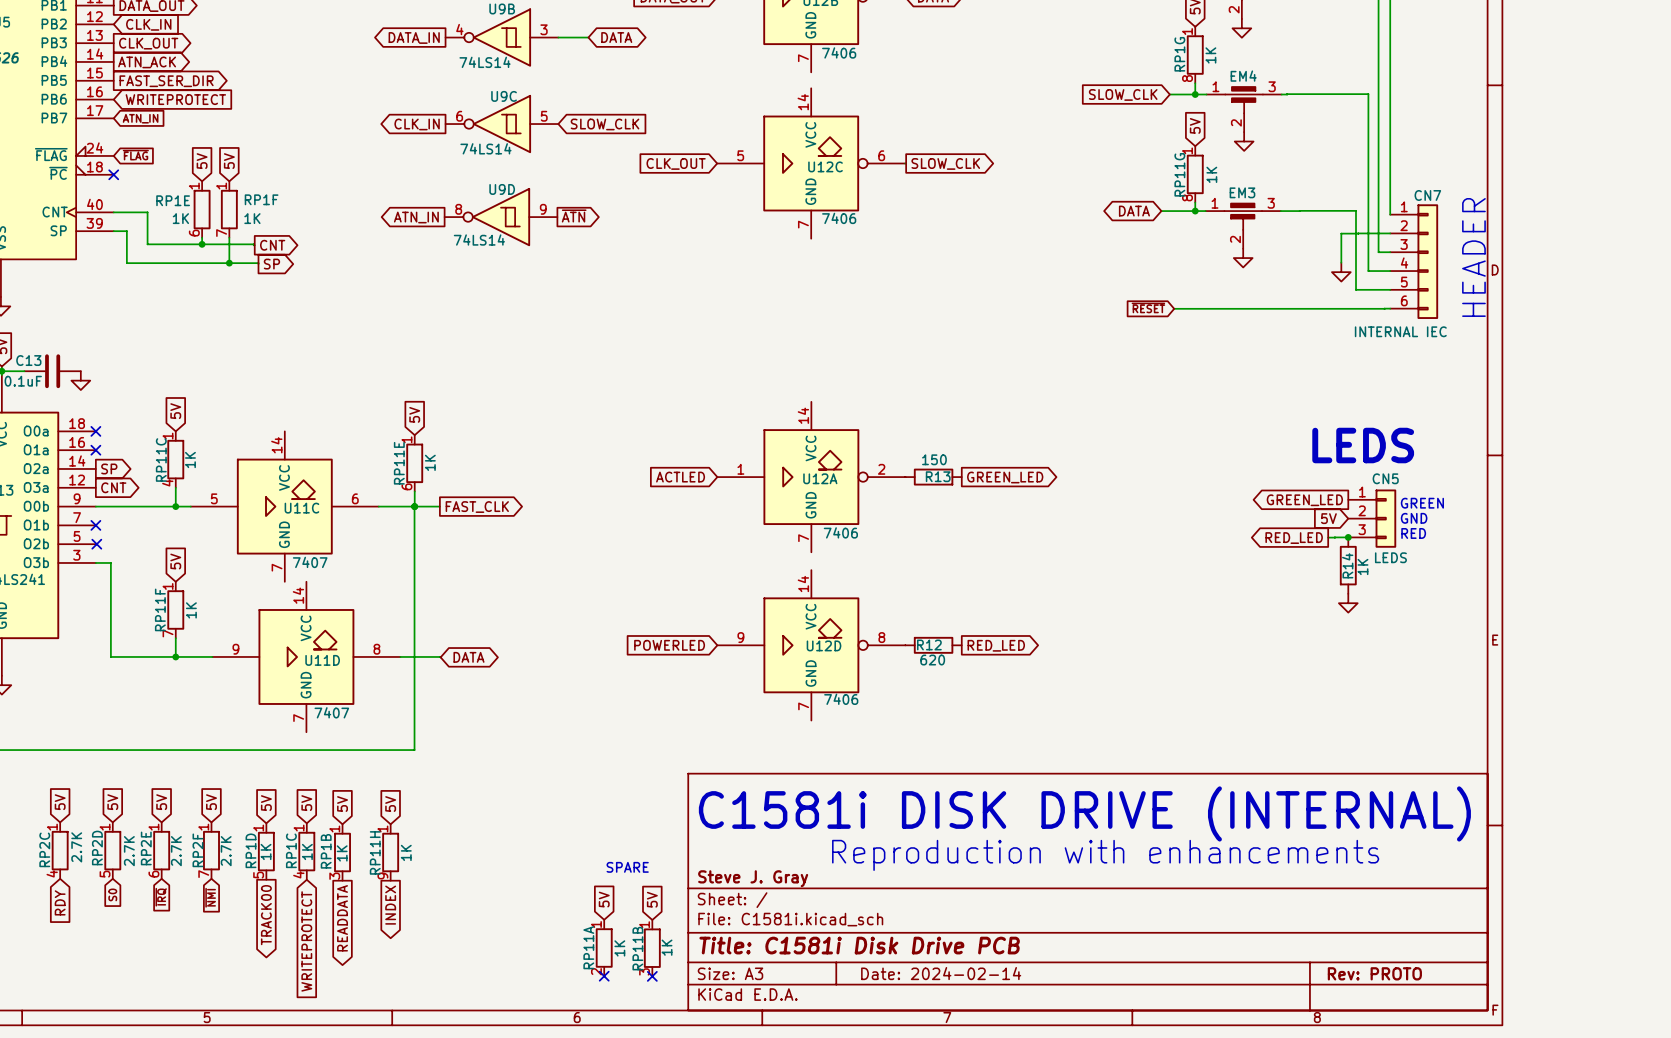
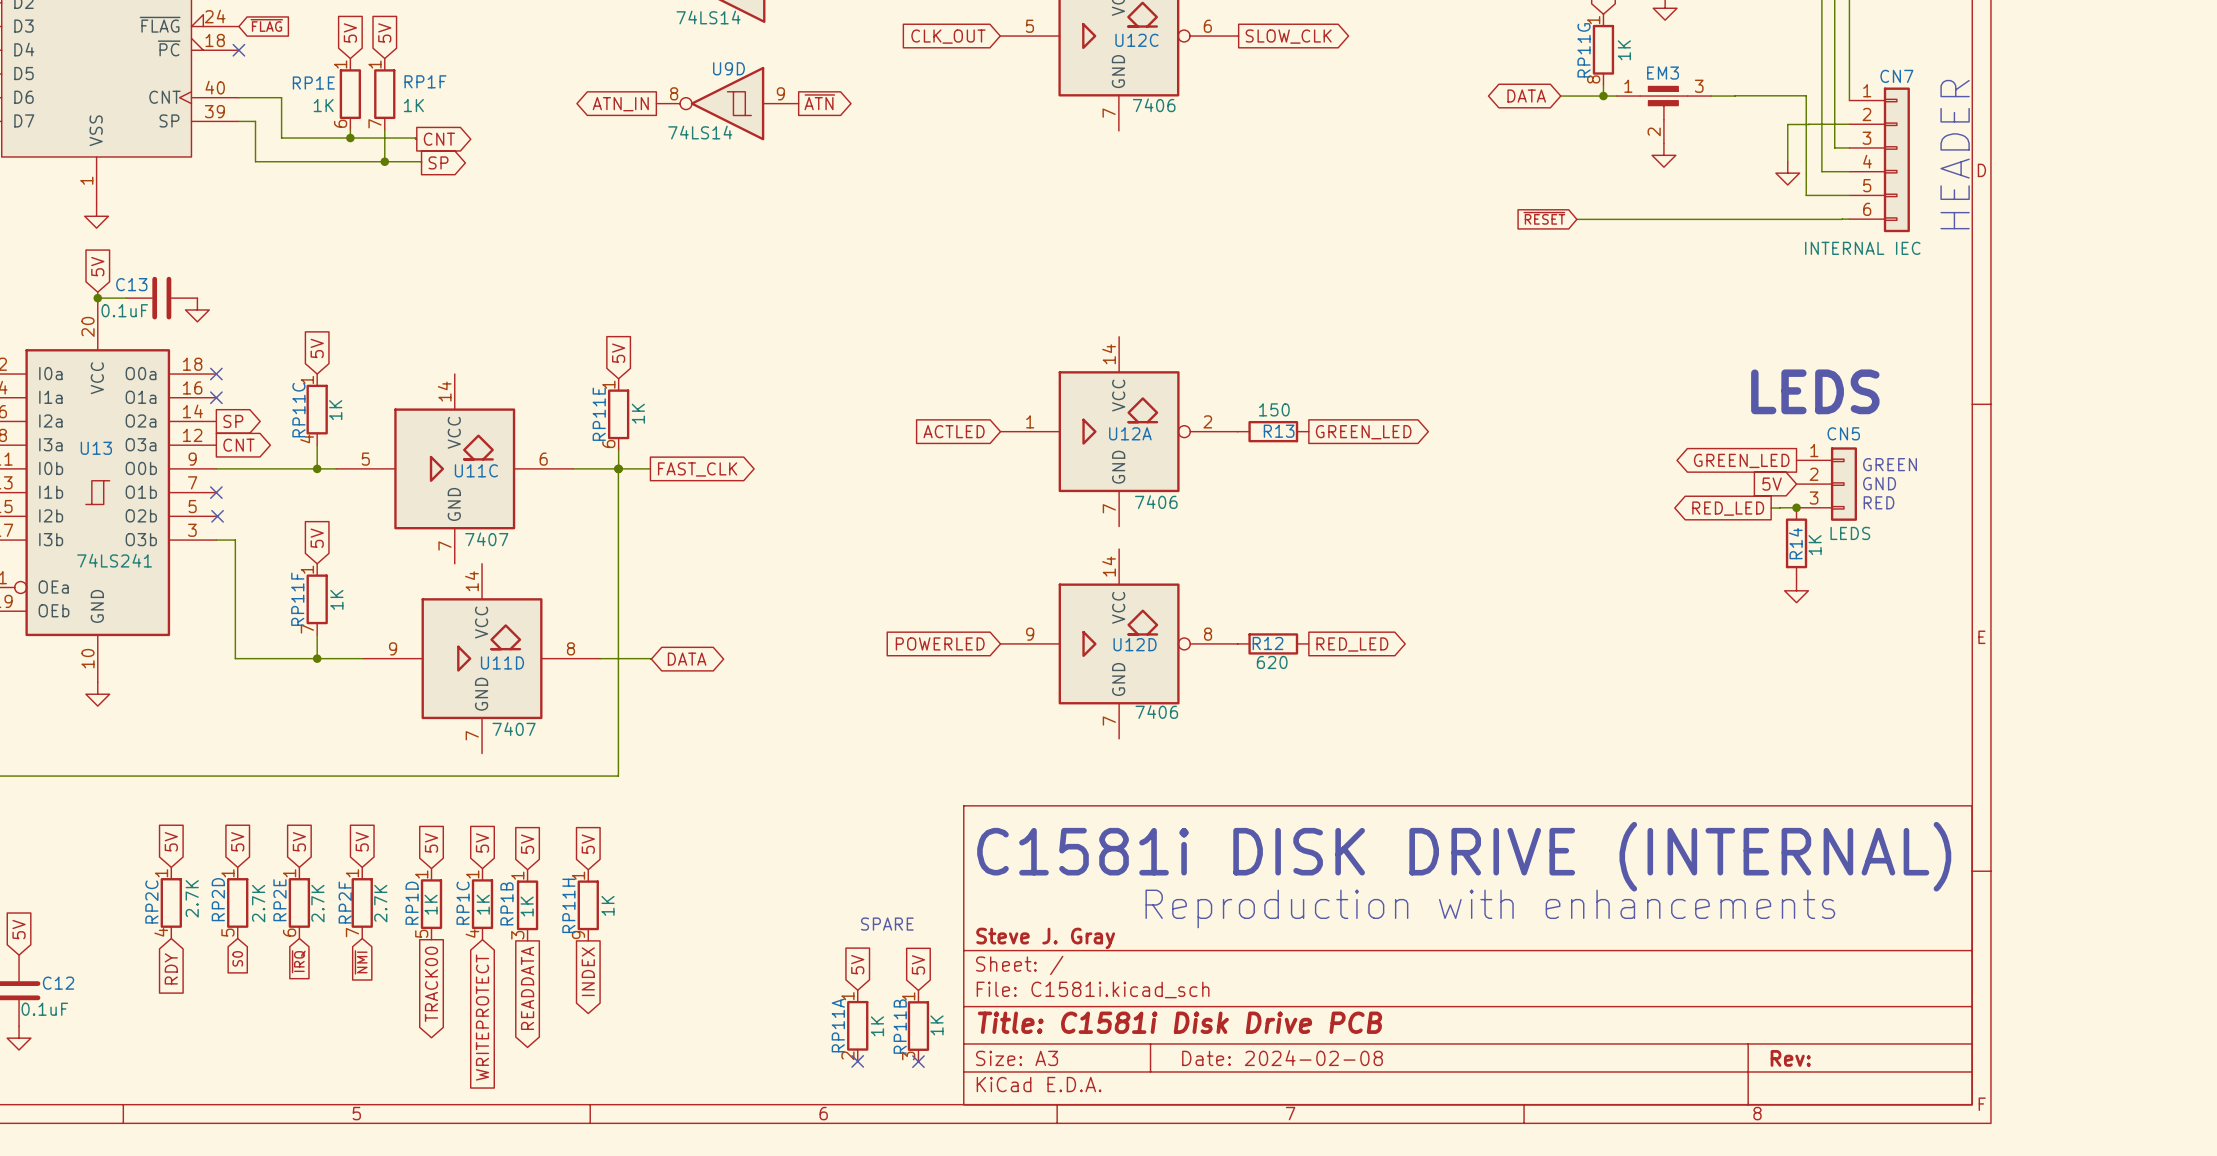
title block: Date: 2024-02-14 (941, 973) -> Date: 2024-02-08 (1282, 1058)
title block: Rev: PROTO (1374, 973) -> Rev: (1790, 1058)

